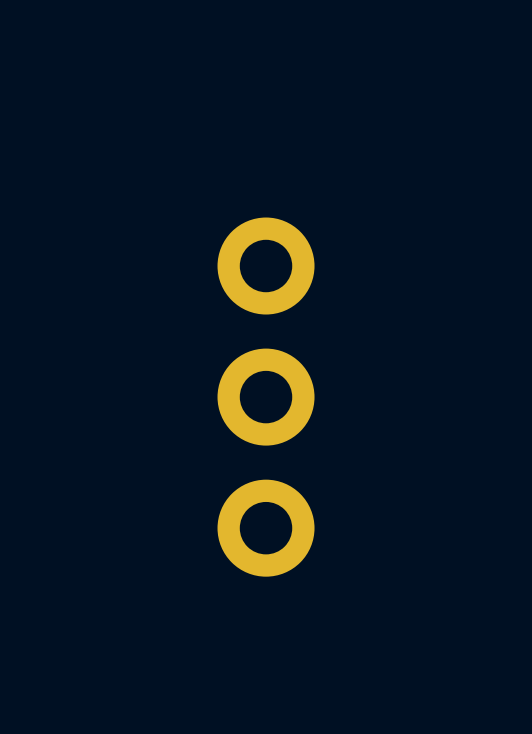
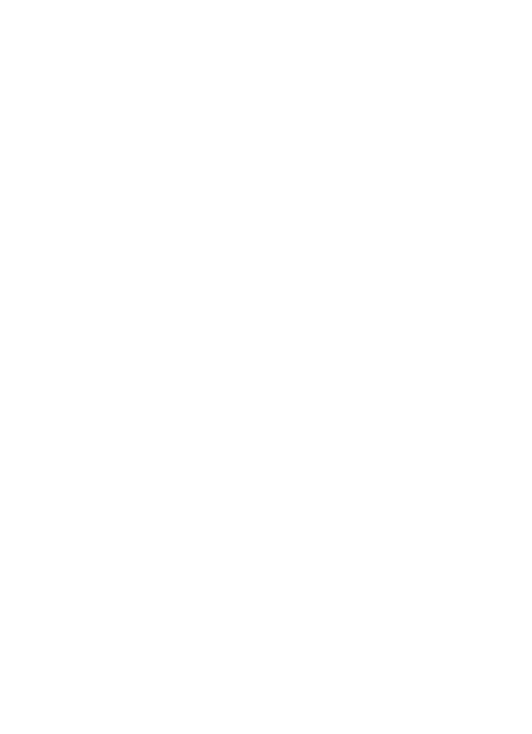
part: (266, 397) -> none

